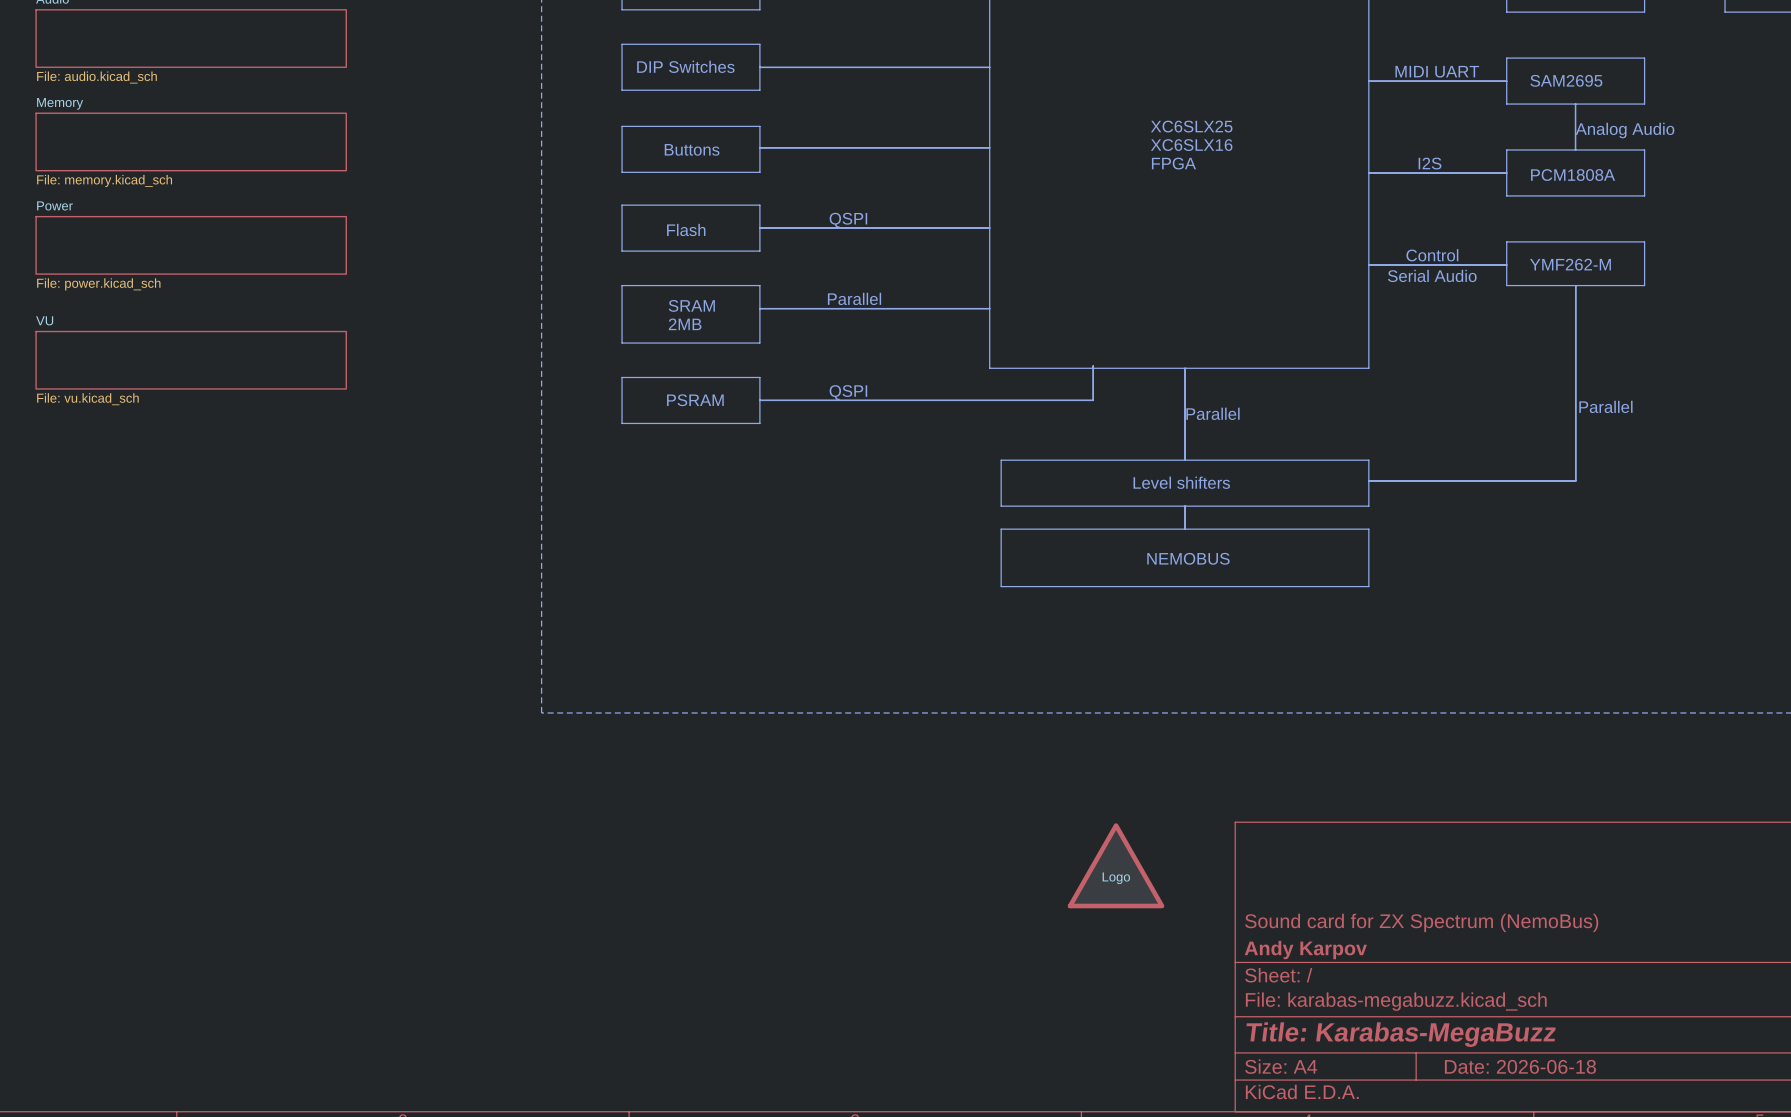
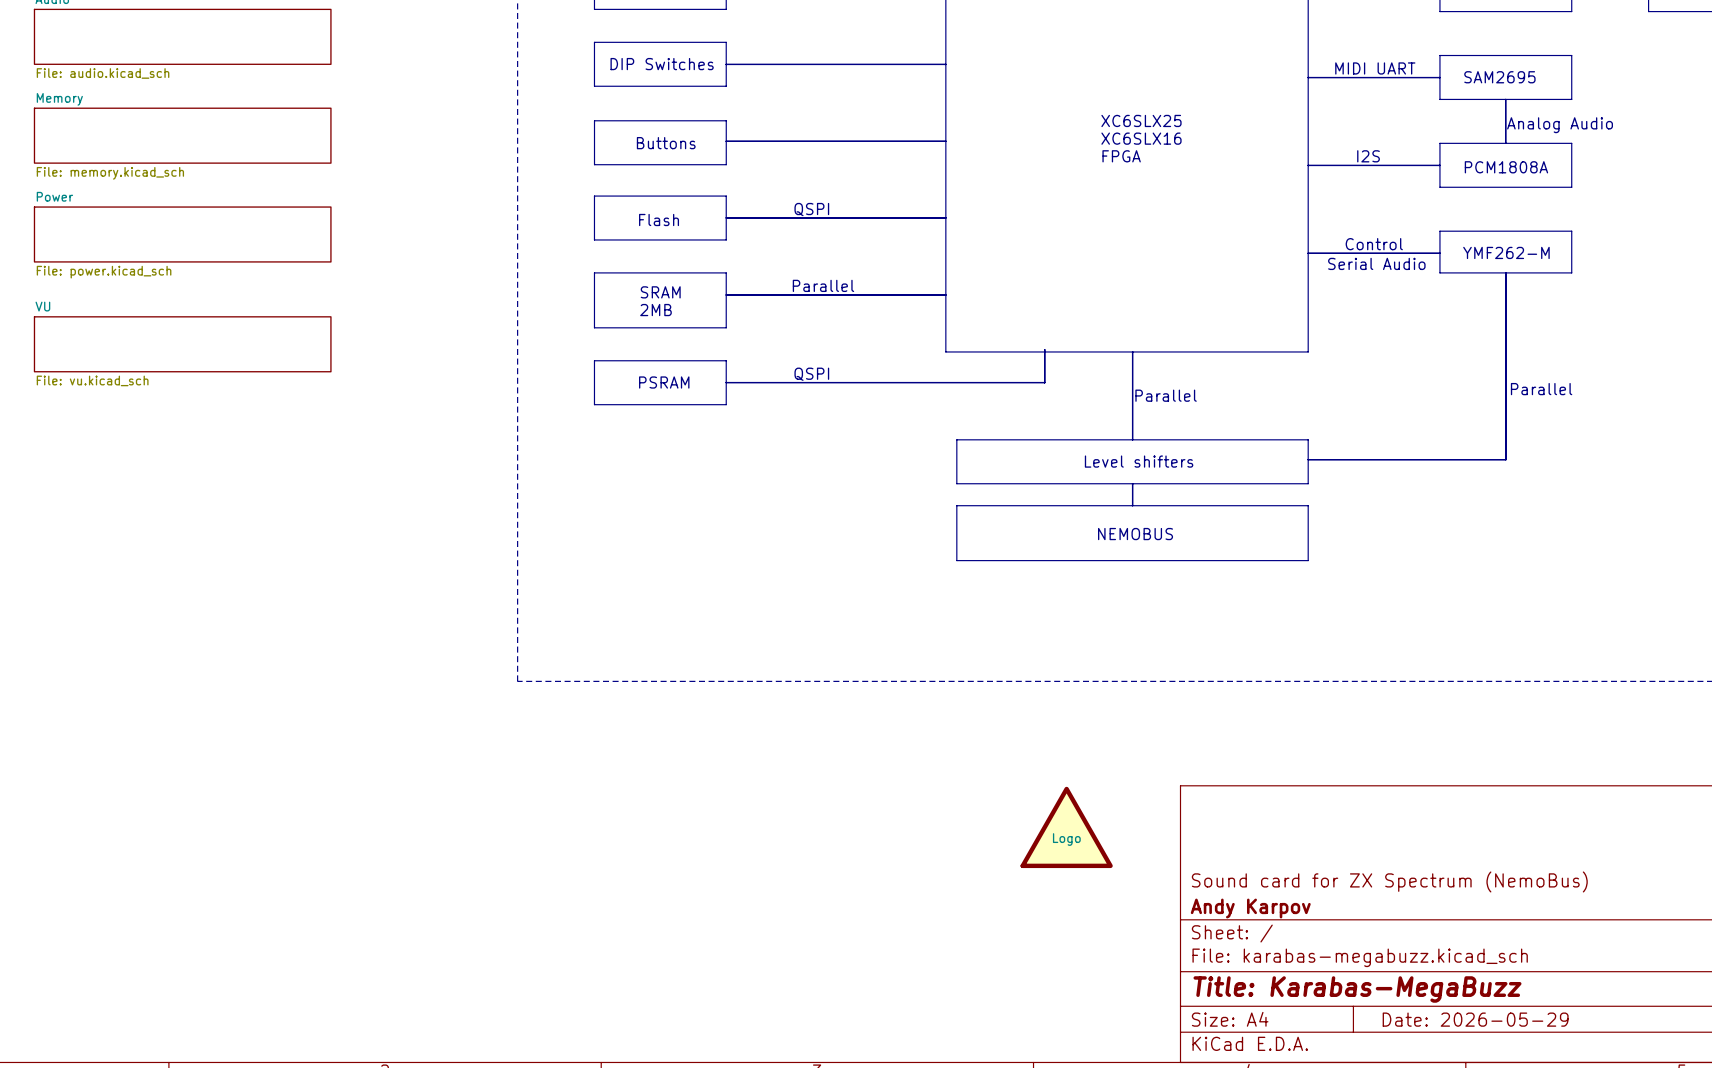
title block: Date: 2026-06-18 (1520, 1066) -> Date: 2026-05-29 (1475, 1019)

